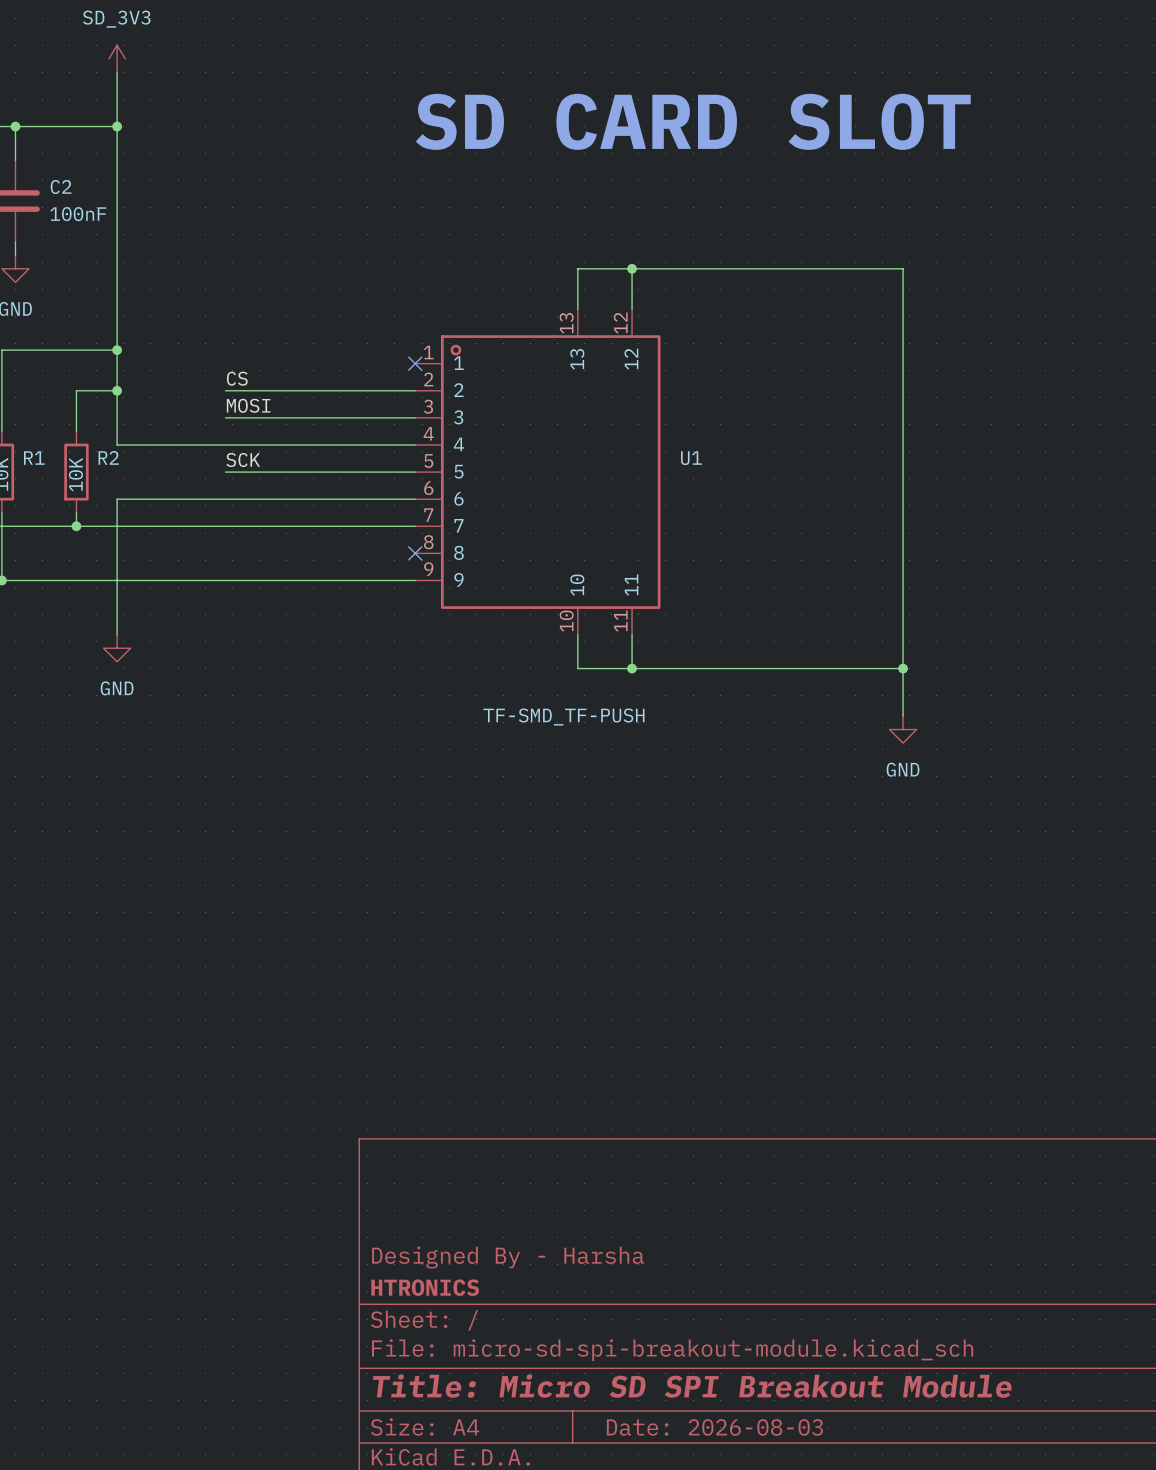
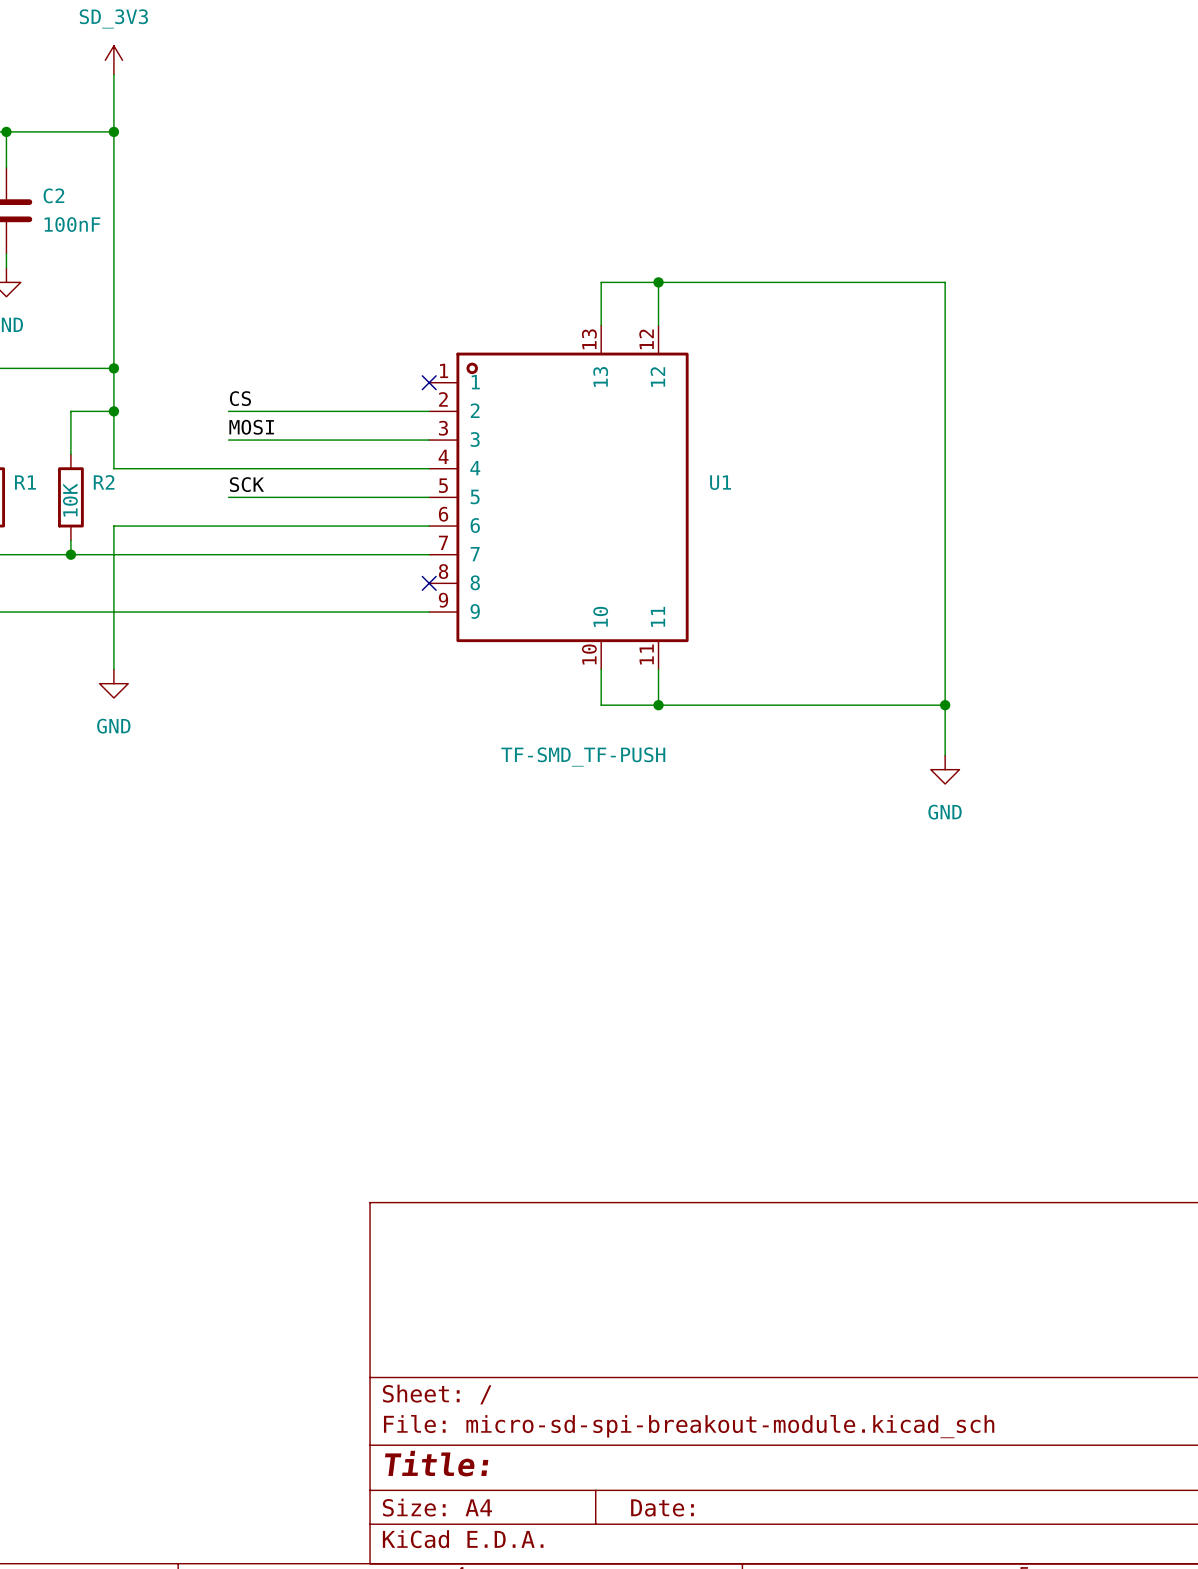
text: SD CARD SLOT (693, 121) -> none
title block: Designed By - Harsha (508, 1257) -> none
title block: HTRONICS (425, 1287) -> none
title block: Title: Micro SD SPI Breakout Module (692, 1386) -> Title: (436, 1463)
title block: Date: 2026-08-03 (714, 1427) -> Date: (662, 1507)

